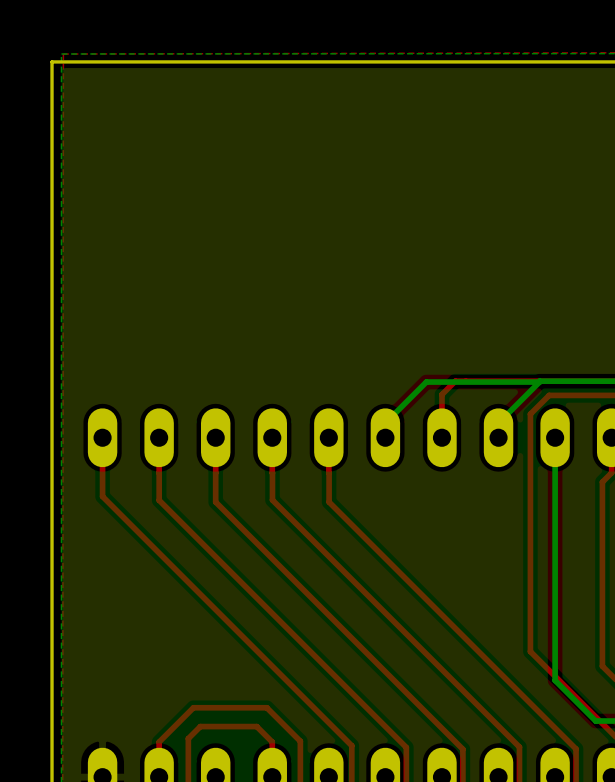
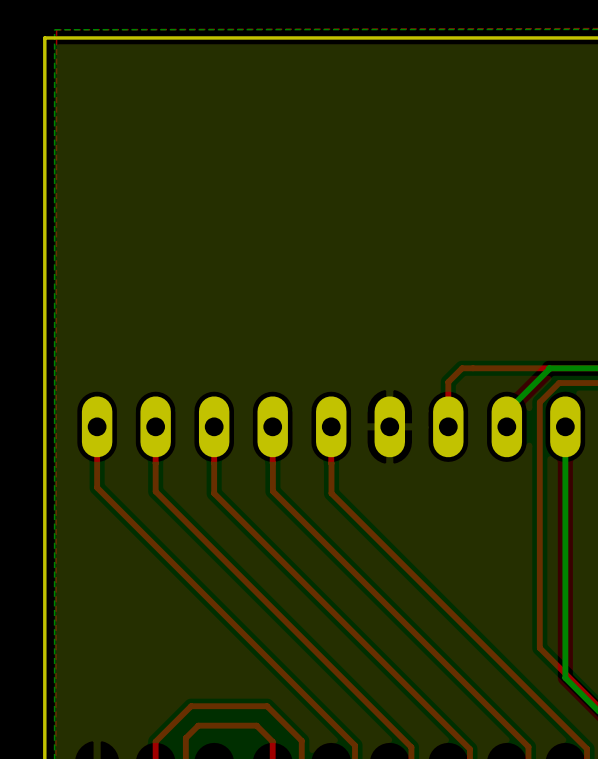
bottom track: (539, 382) (426, 382) (385, 423) (385, 437) -> none

